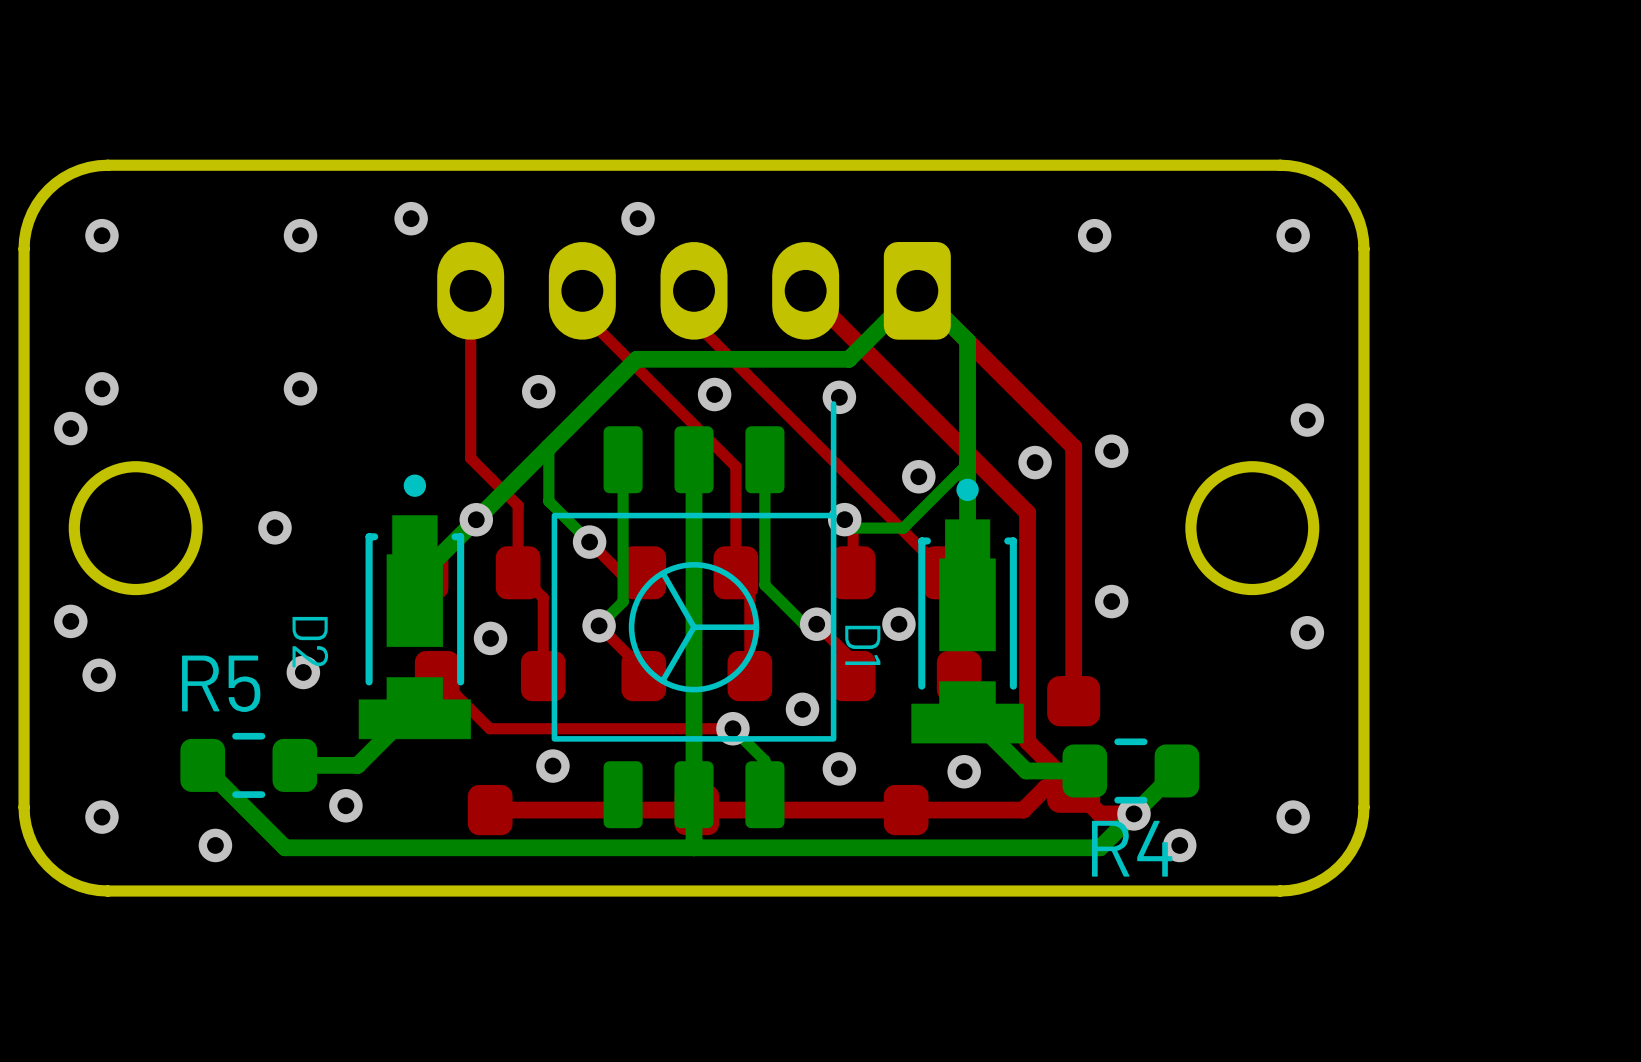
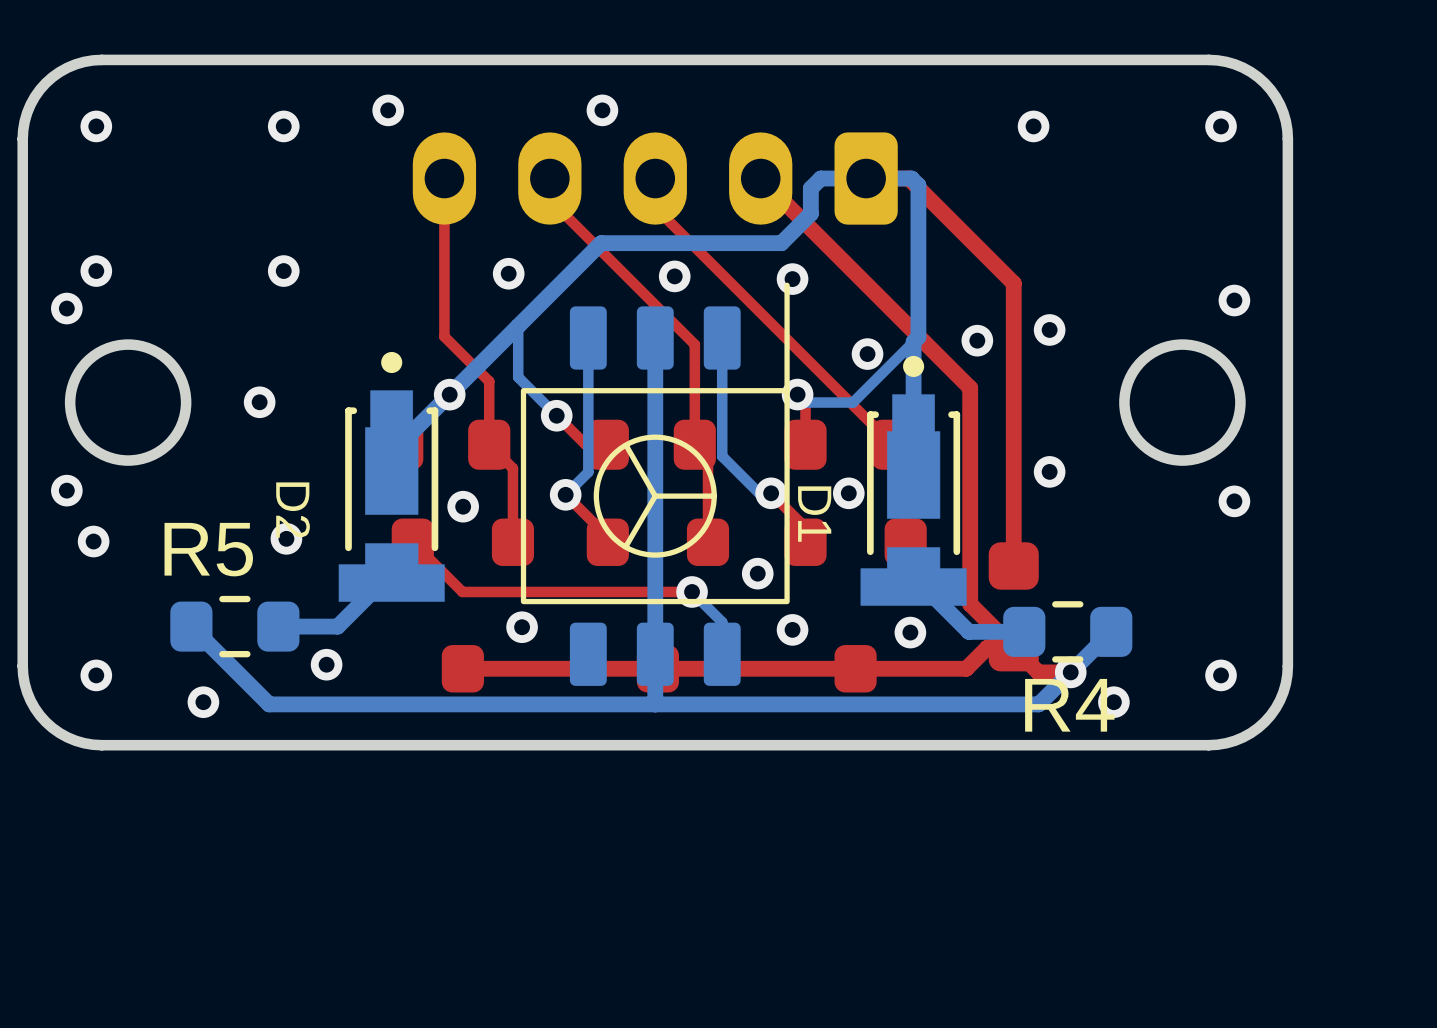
top track: (917, 290) (1073, 447) -> (866, 178) (908, 178) (1013, 283) (1013, 326)
bottom track: (827, 359) (848, 359) (917, 290) (967, 341) (967, 463) -> (781, 243) (810, 213) (810, 188) (820, 178) (911, 178) (918, 185) (918, 337) (913, 341)

